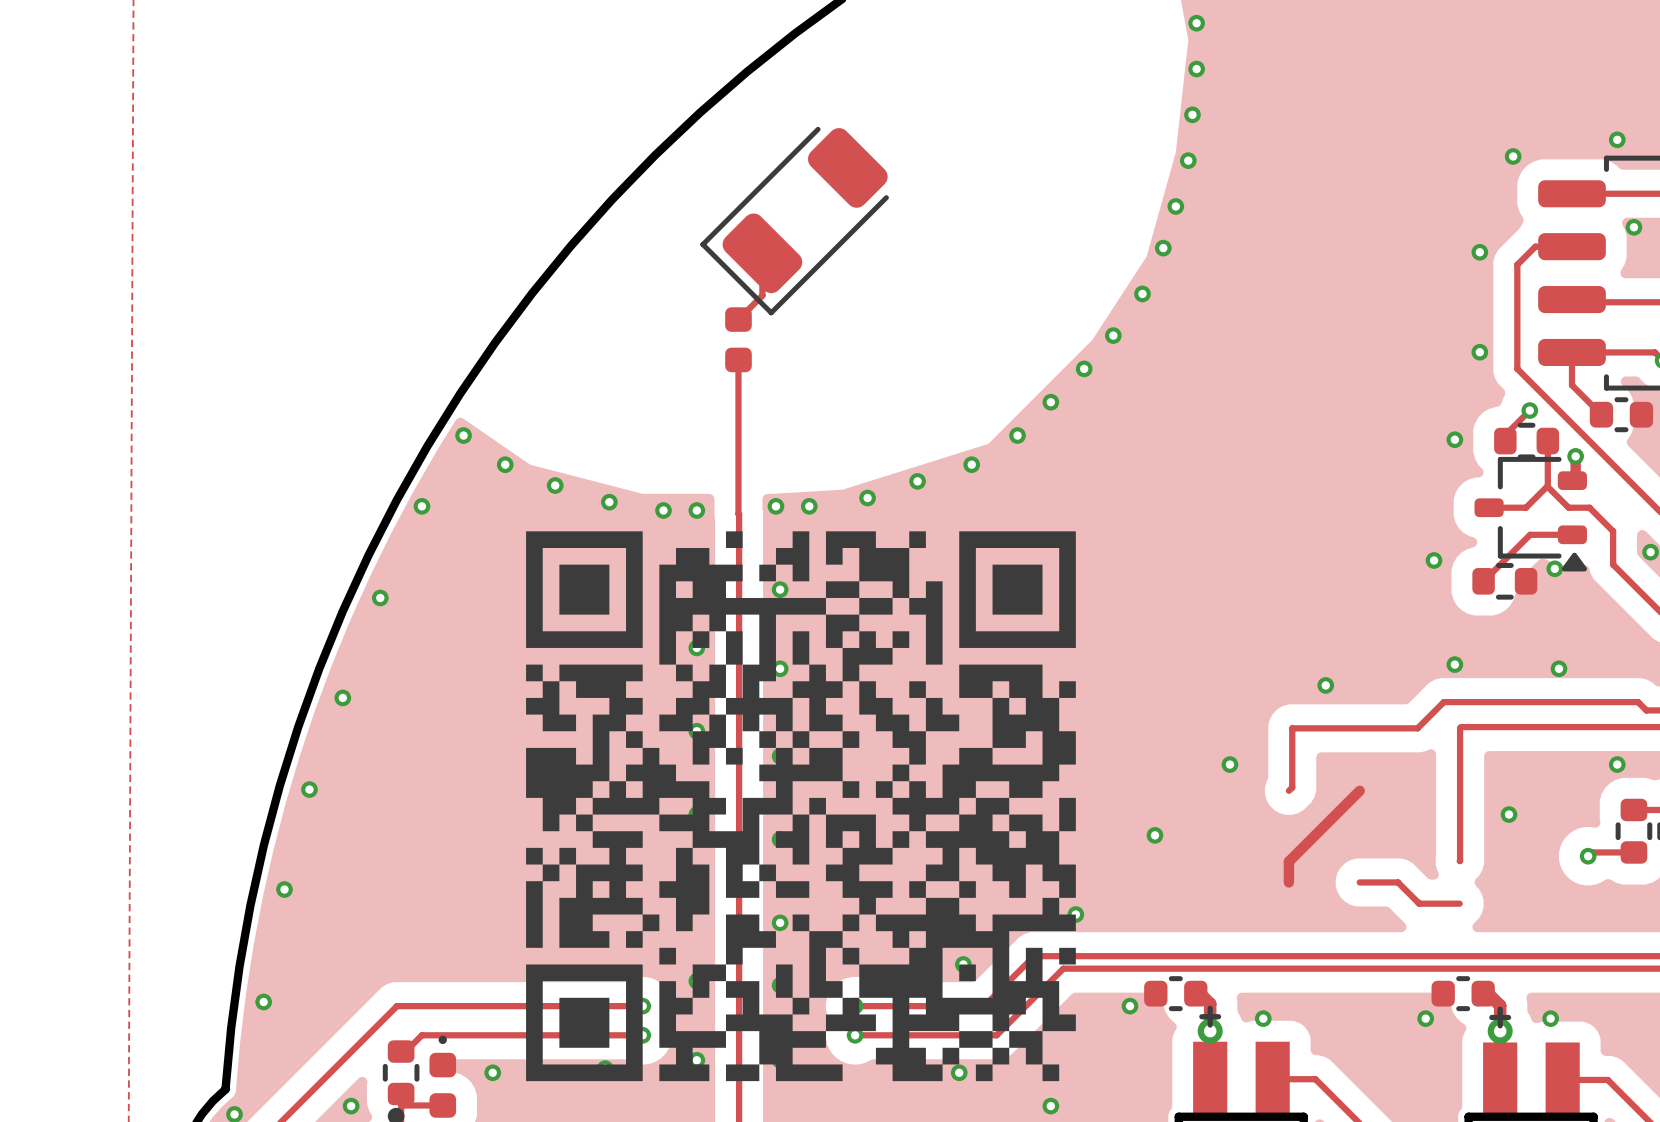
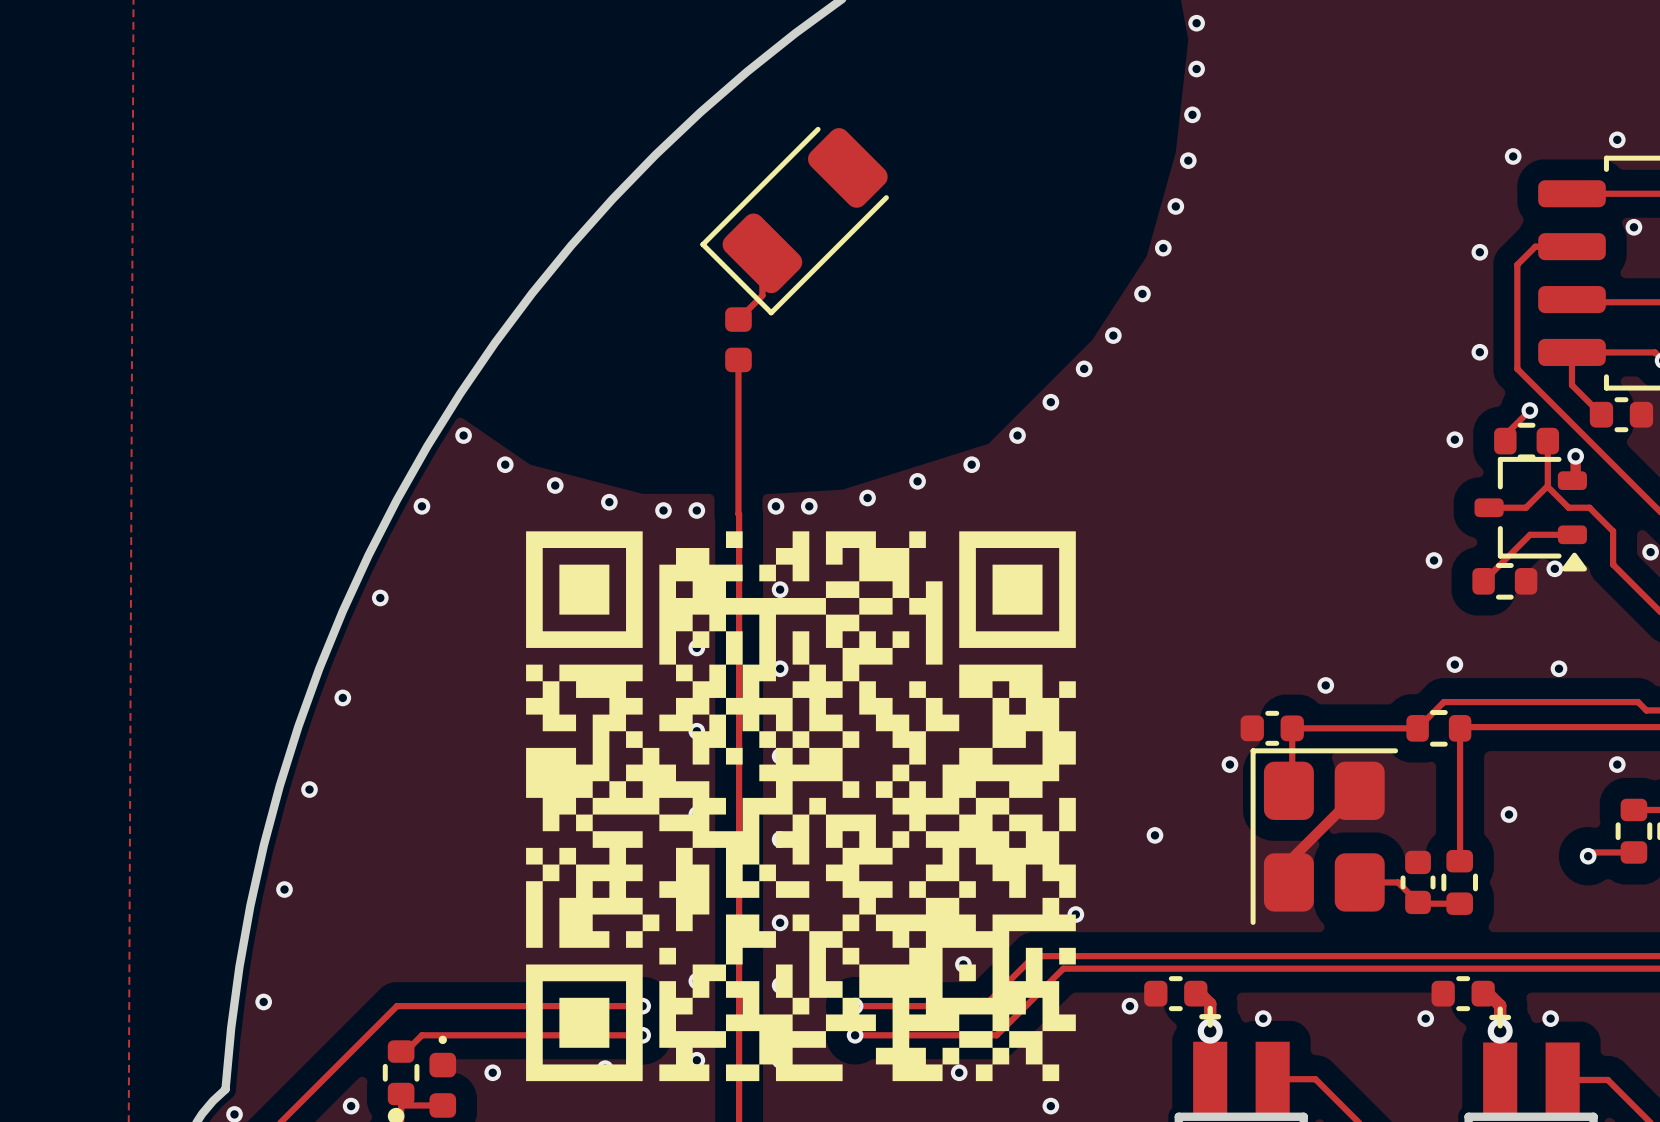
part: none -> (1272, 728)
part: none -> (1438, 728)
part: none -> (1324, 836)
part: none -> (1418, 882)
part: none -> (1459, 882)

